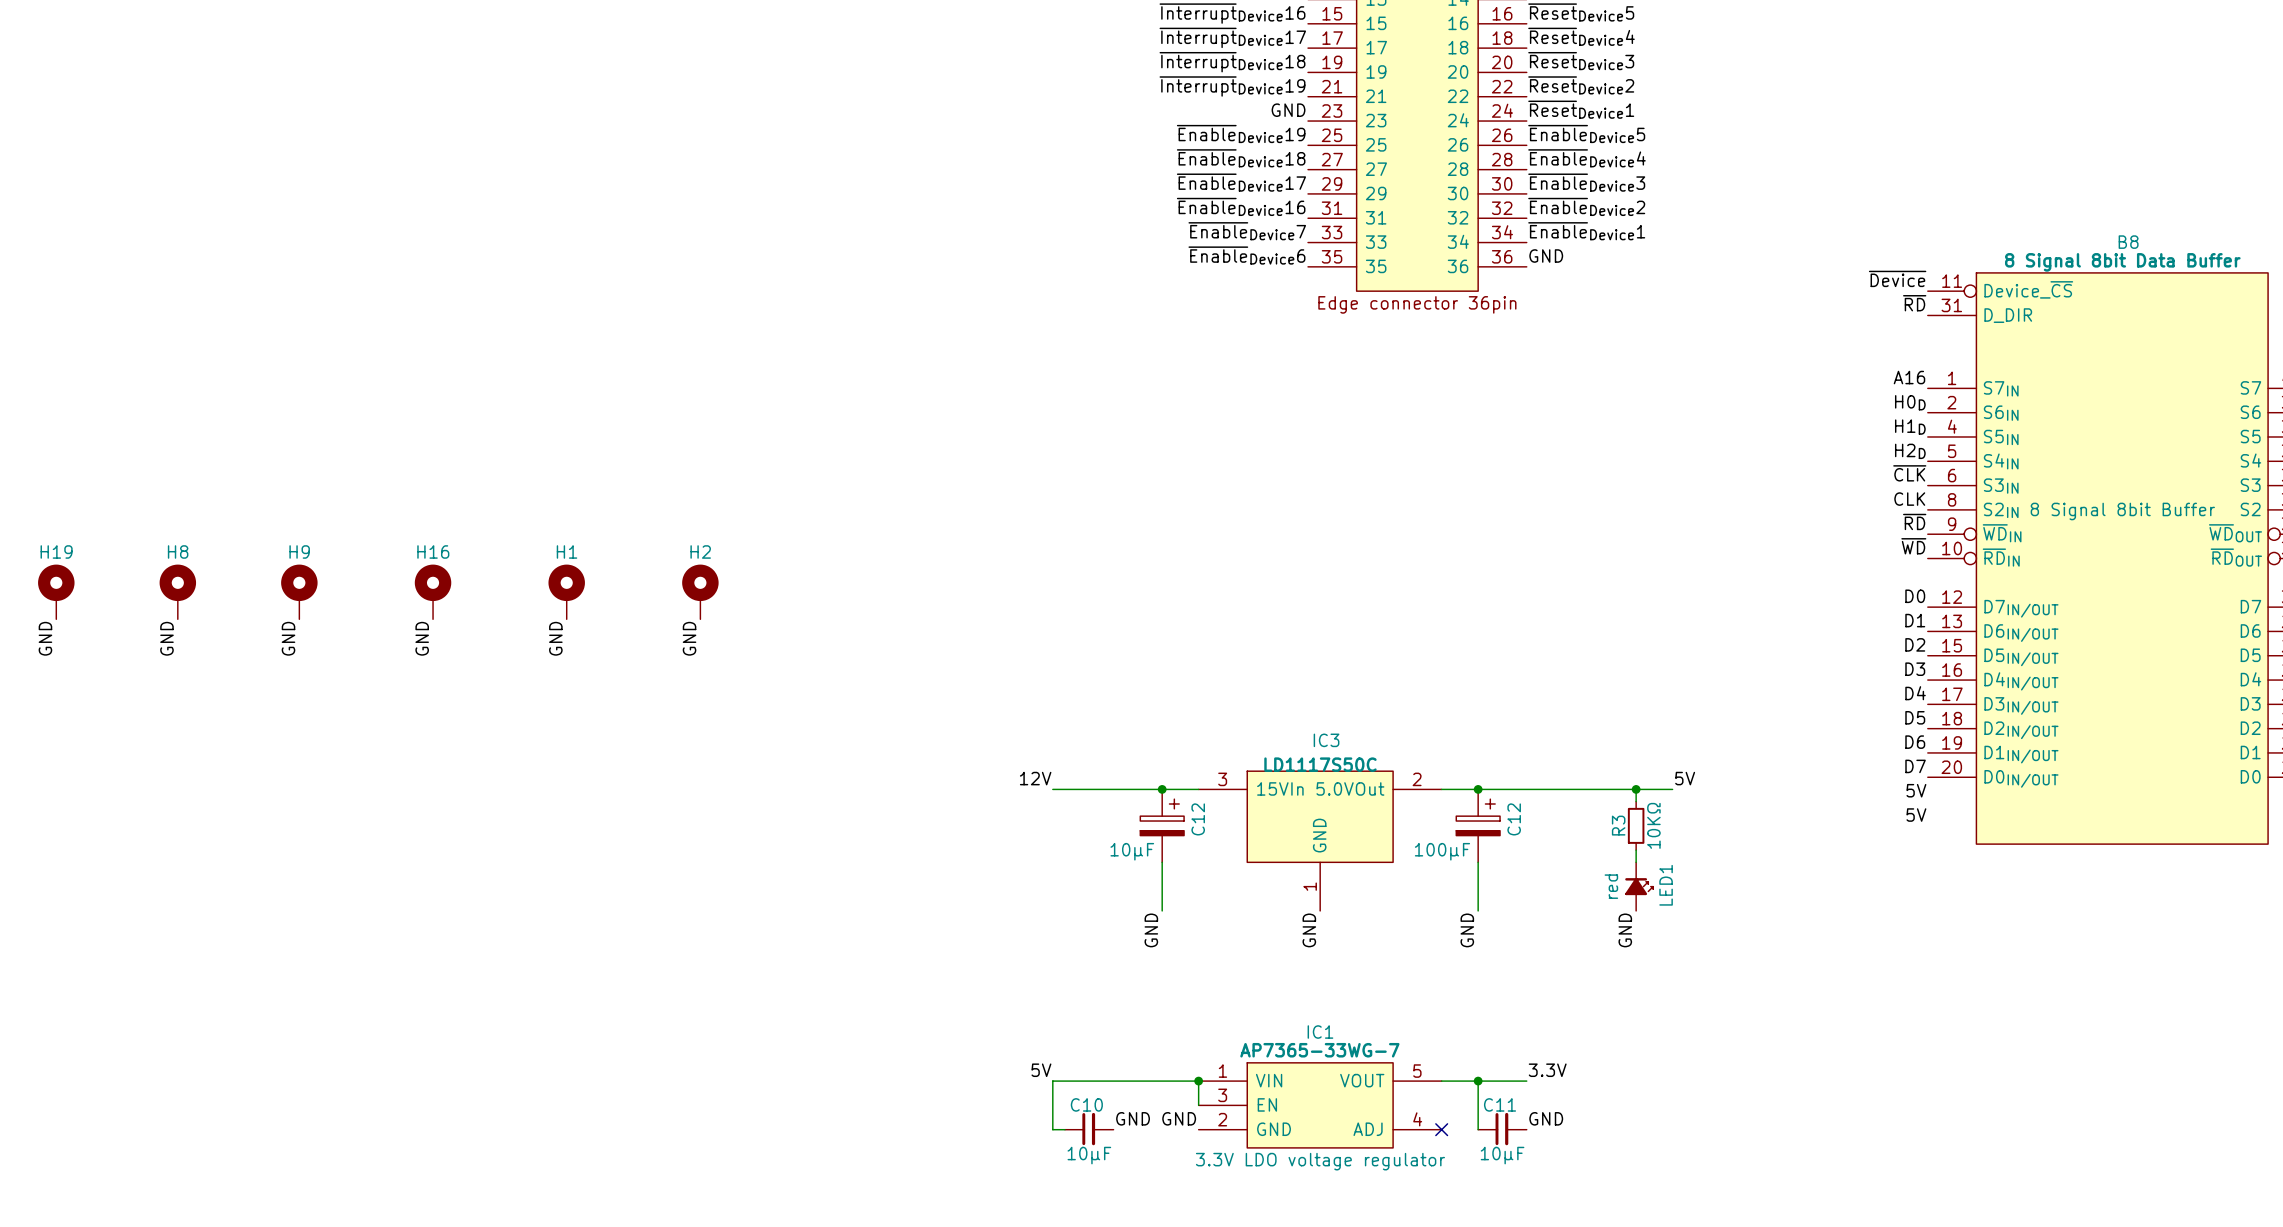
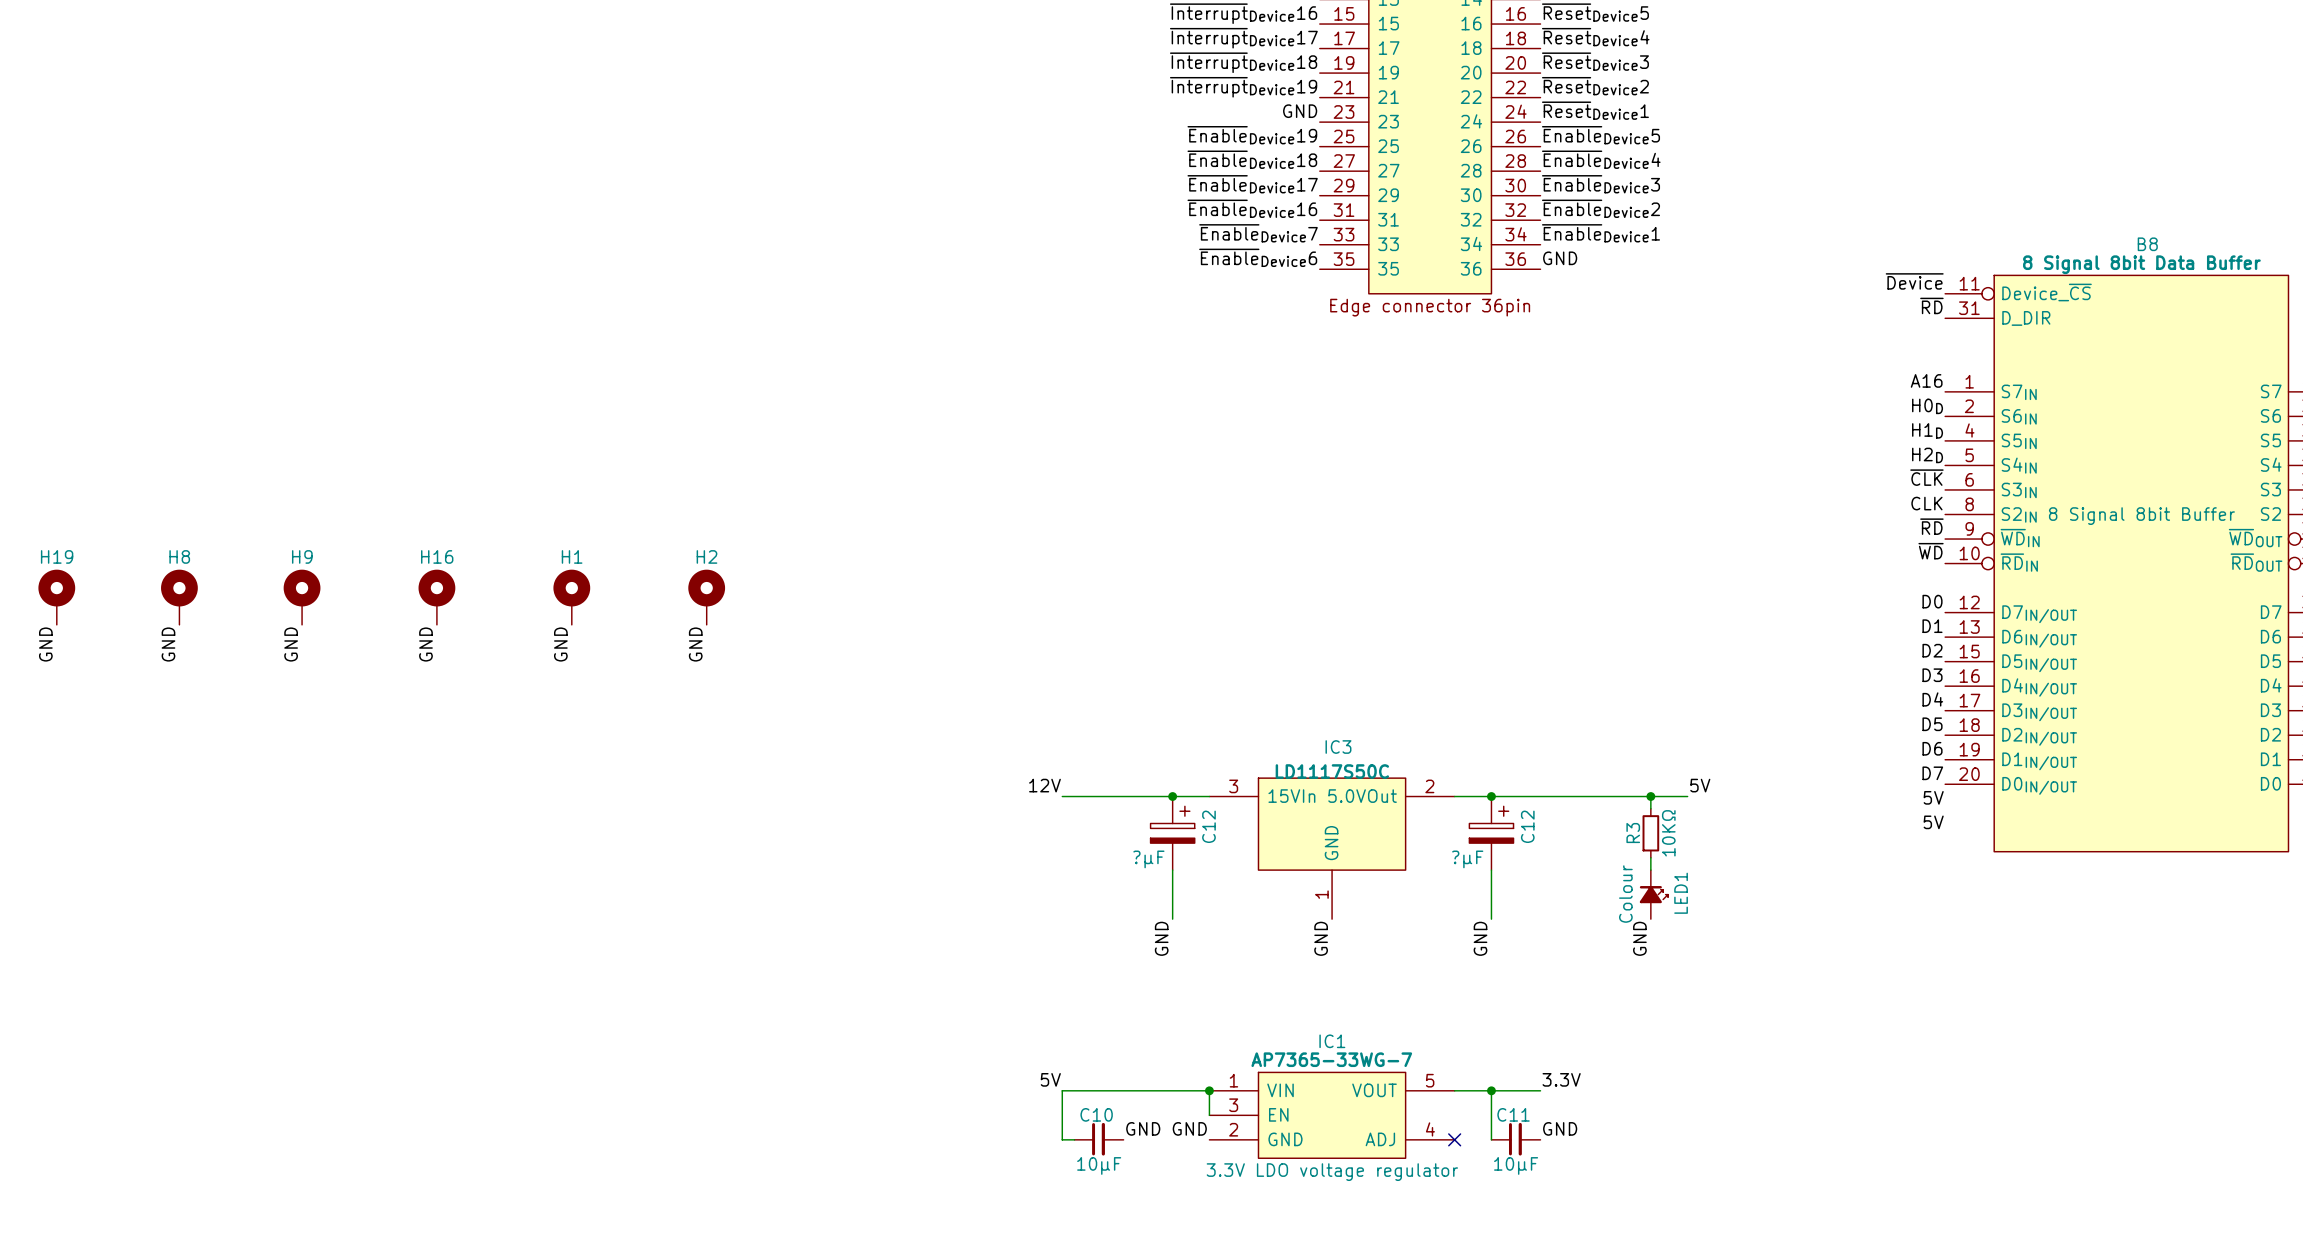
C12 text: 10μF (1132, 851) -> ?μF (1148, 859)
C12 text: 100μF (1442, 851) -> ?μF (1467, 859)
LED1 text: red (1611, 886) -> Colour (1625, 894)

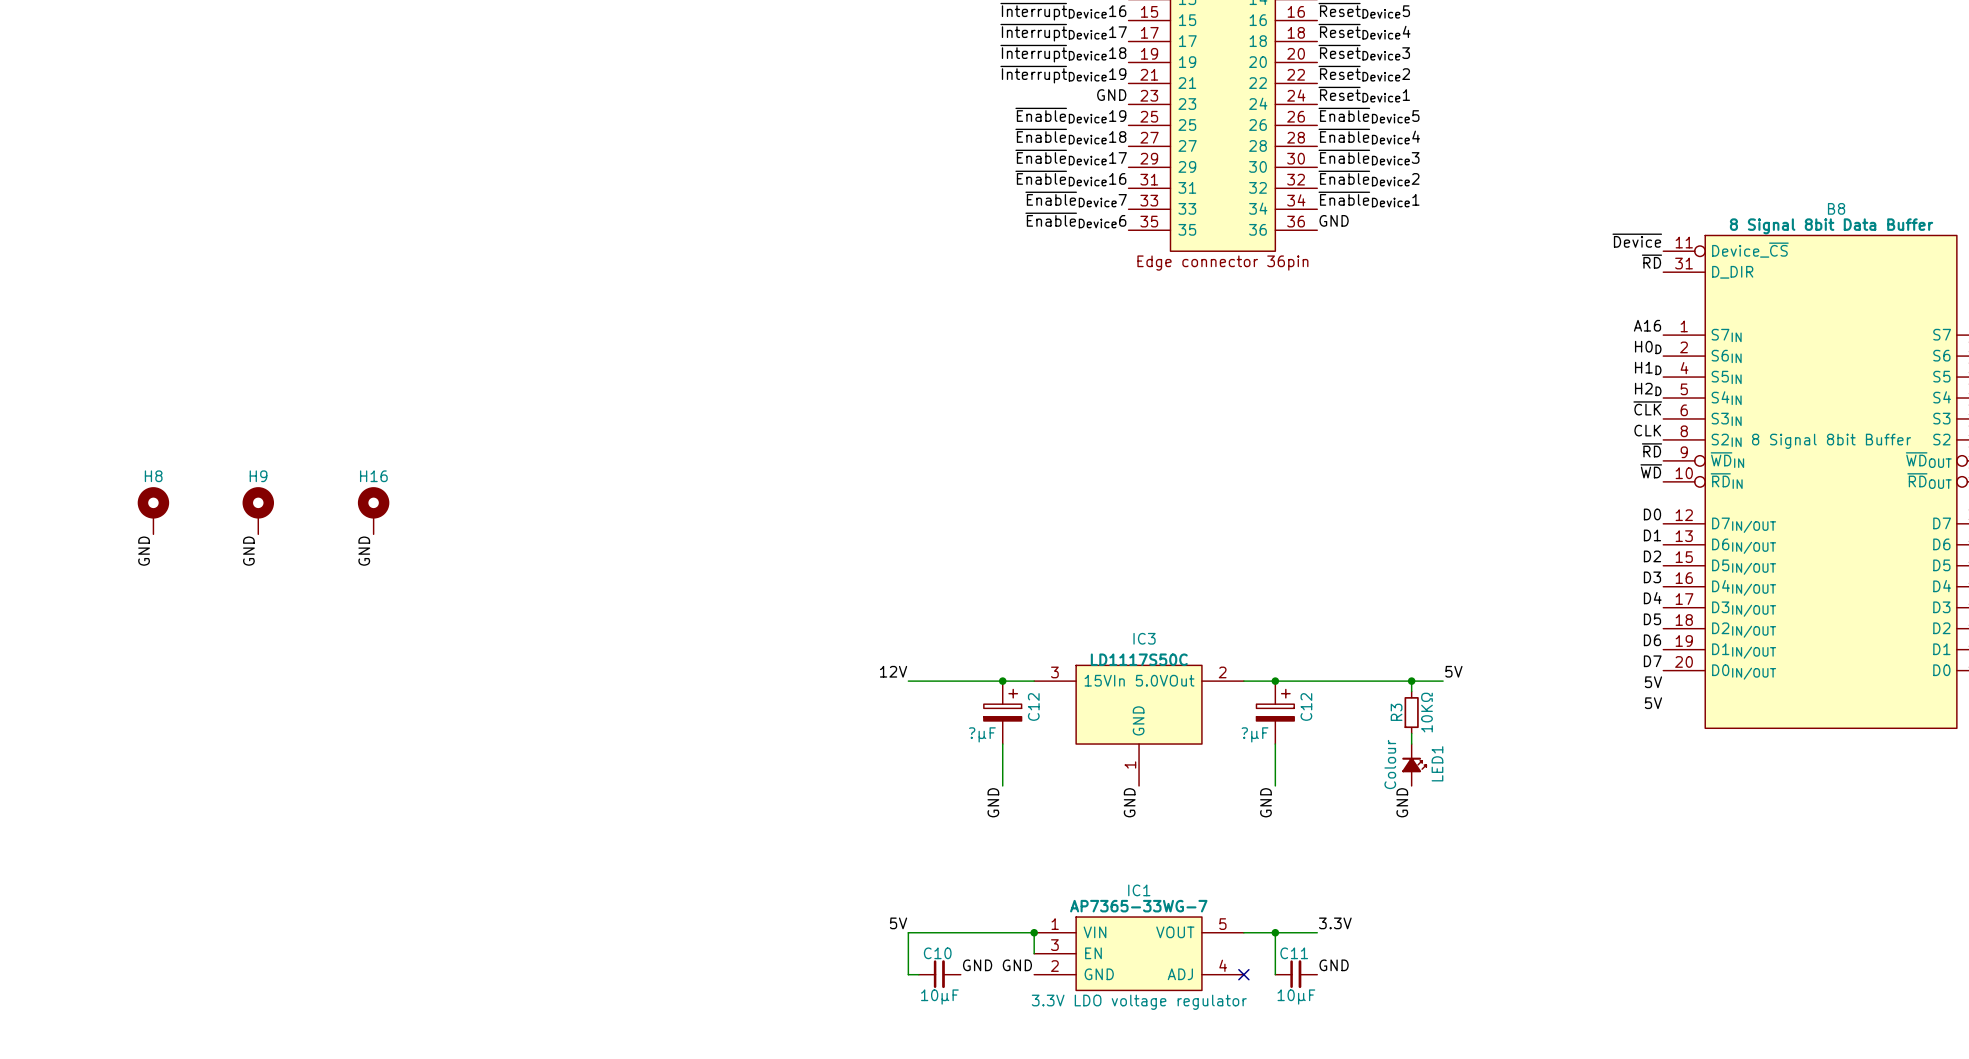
H19: (56, 597) -> none
H1: (571, 597) -> none
H2: (706, 597) -> none
label: GND (45, 644) -> none
label: GND (560, 644) -> none
label: GND (695, 644) -> none

